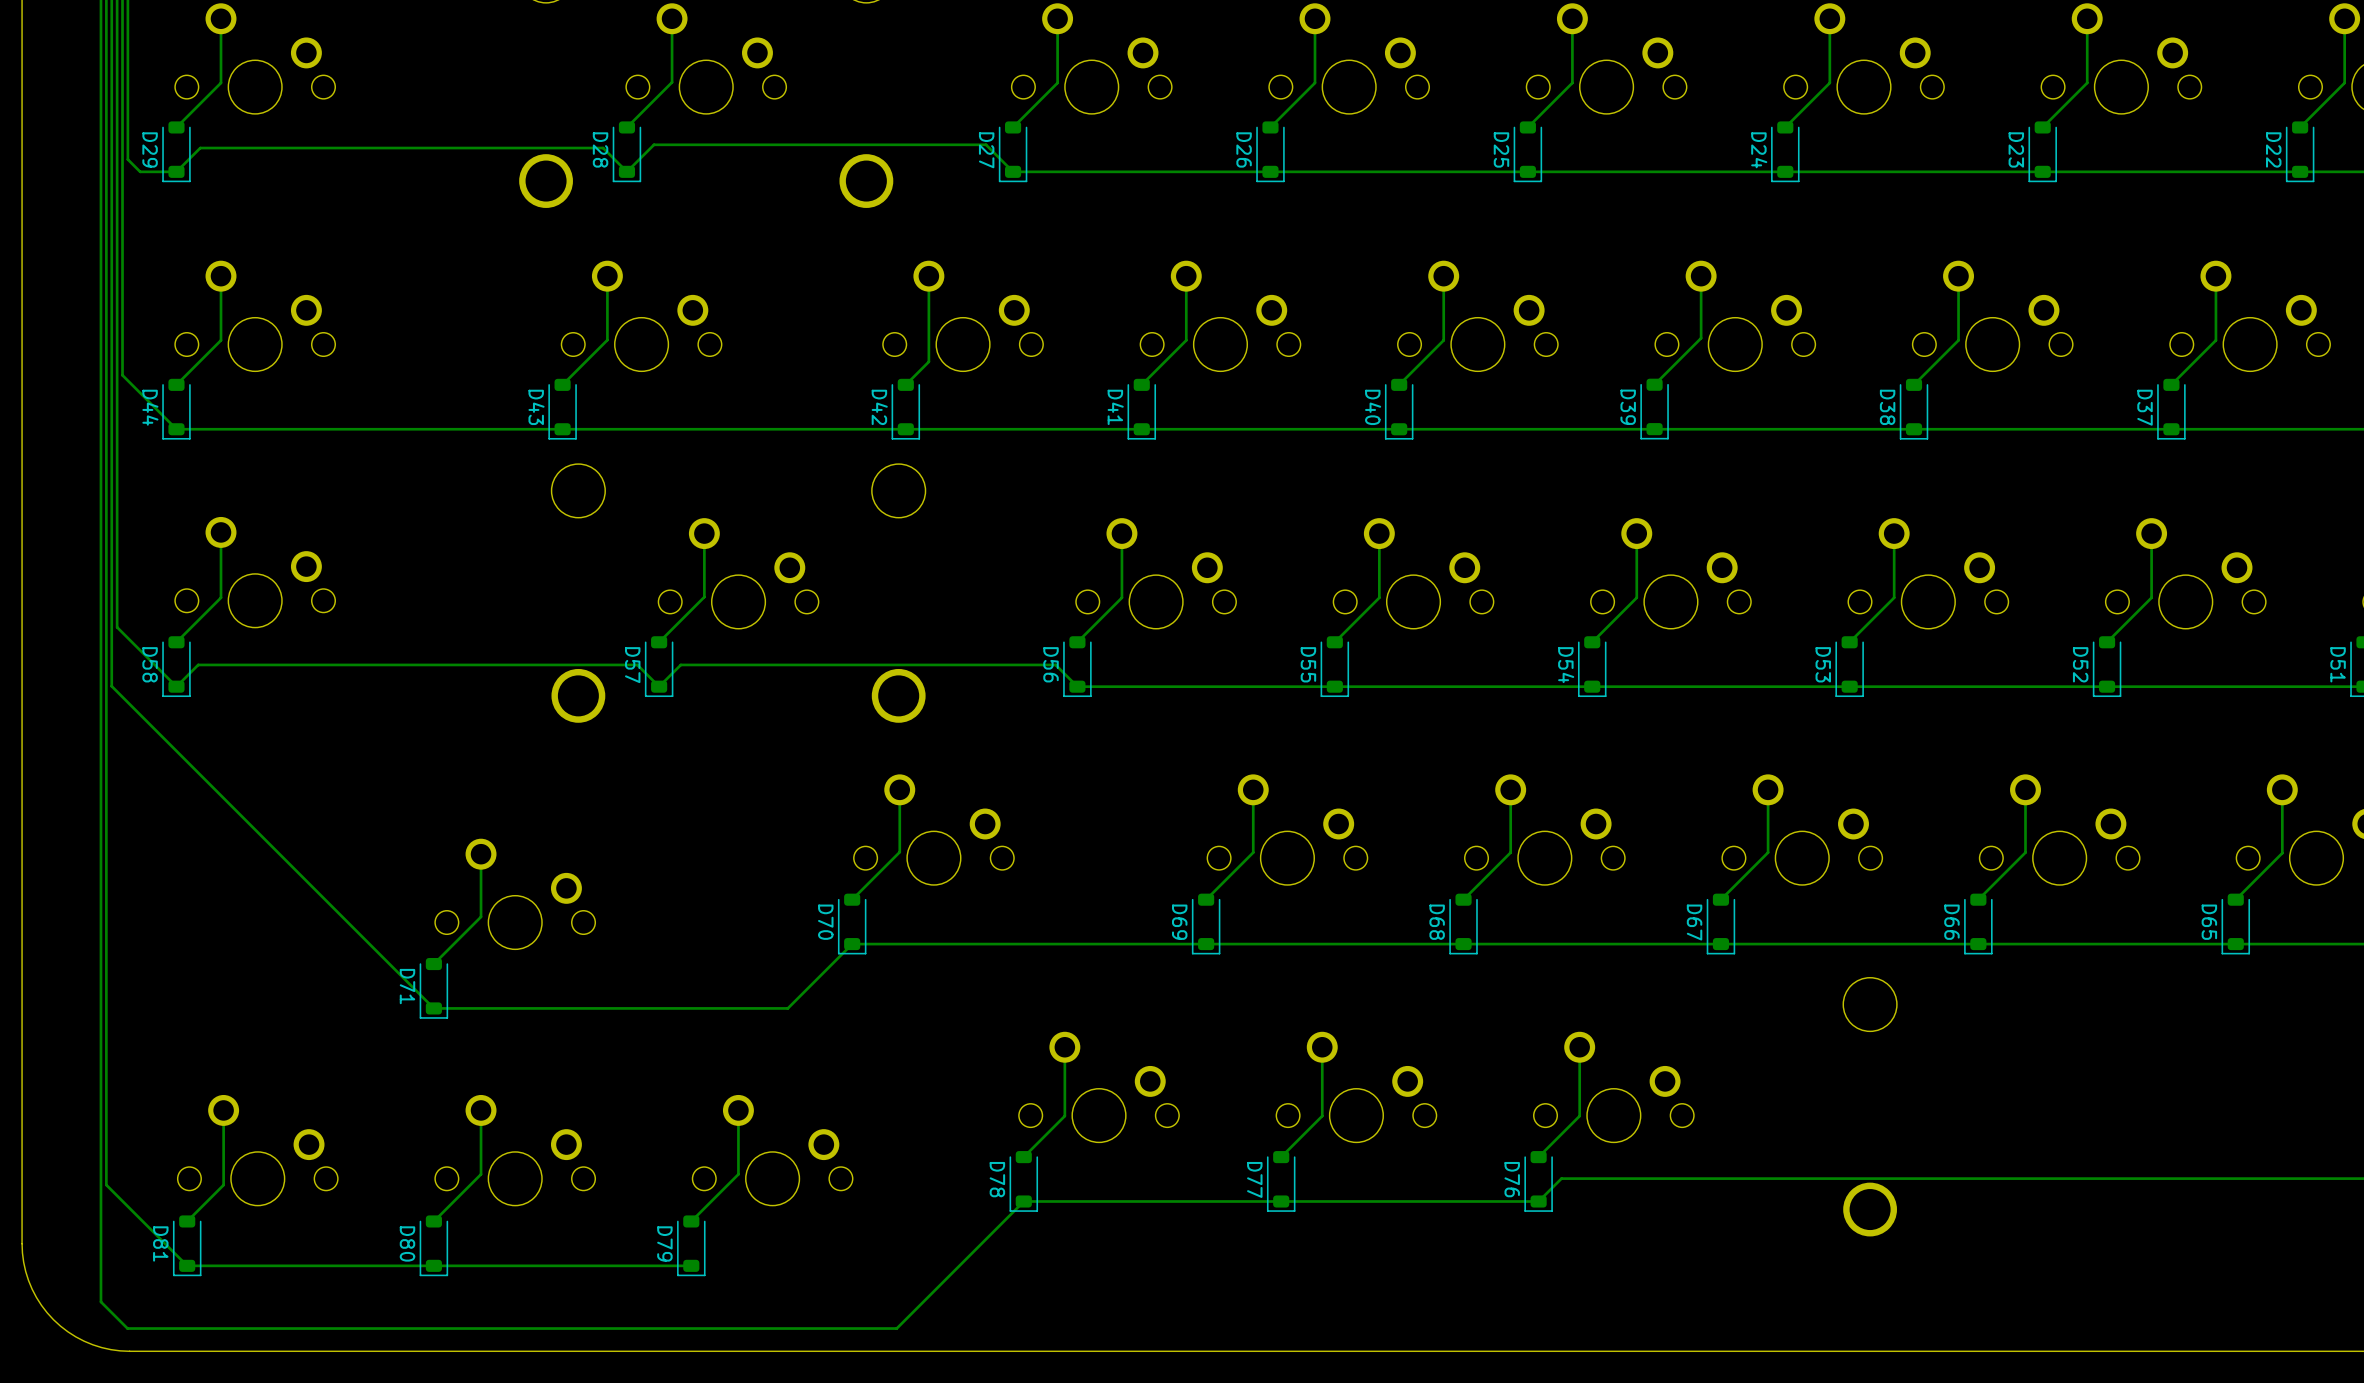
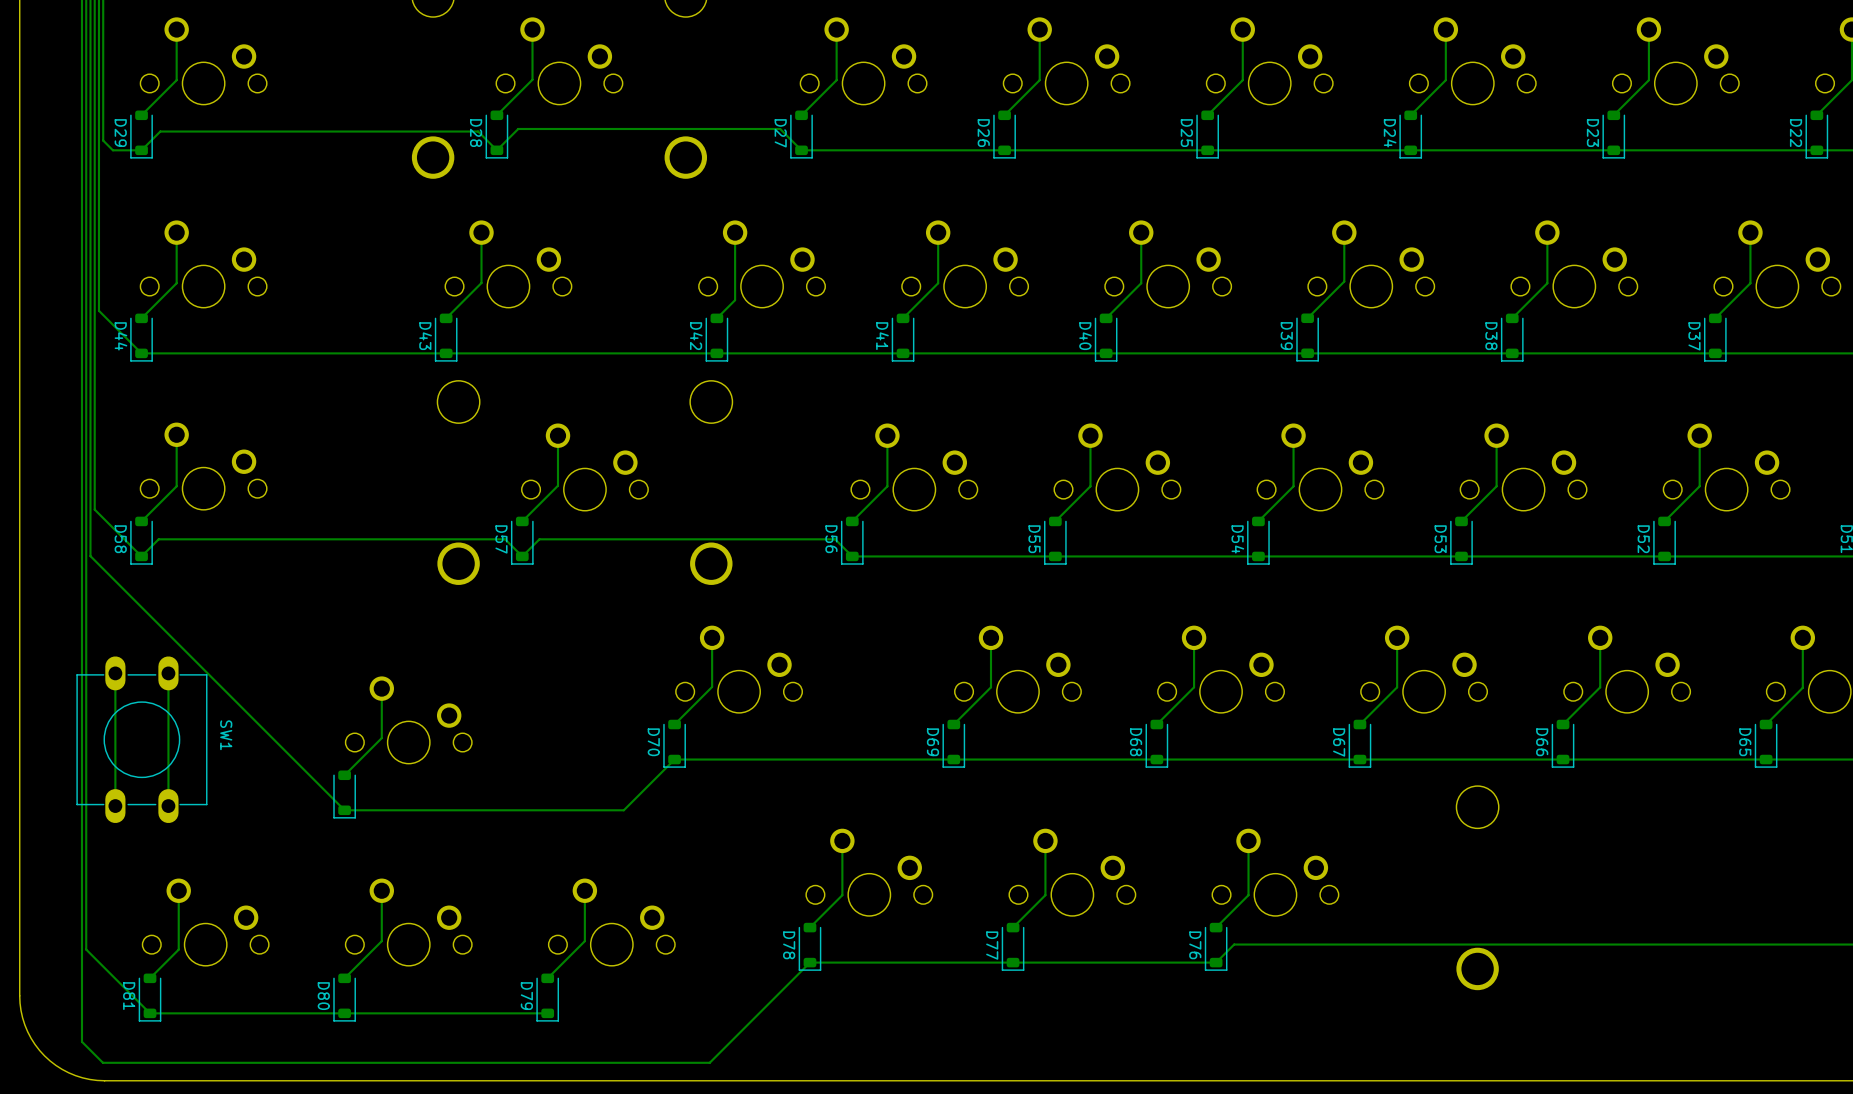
track: none -> (115, 673) (115, 806)
track: none -> (168, 673) (168, 806)
SW1: none -> (141, 739)
D71 name: D71 (407, 986) -> none

